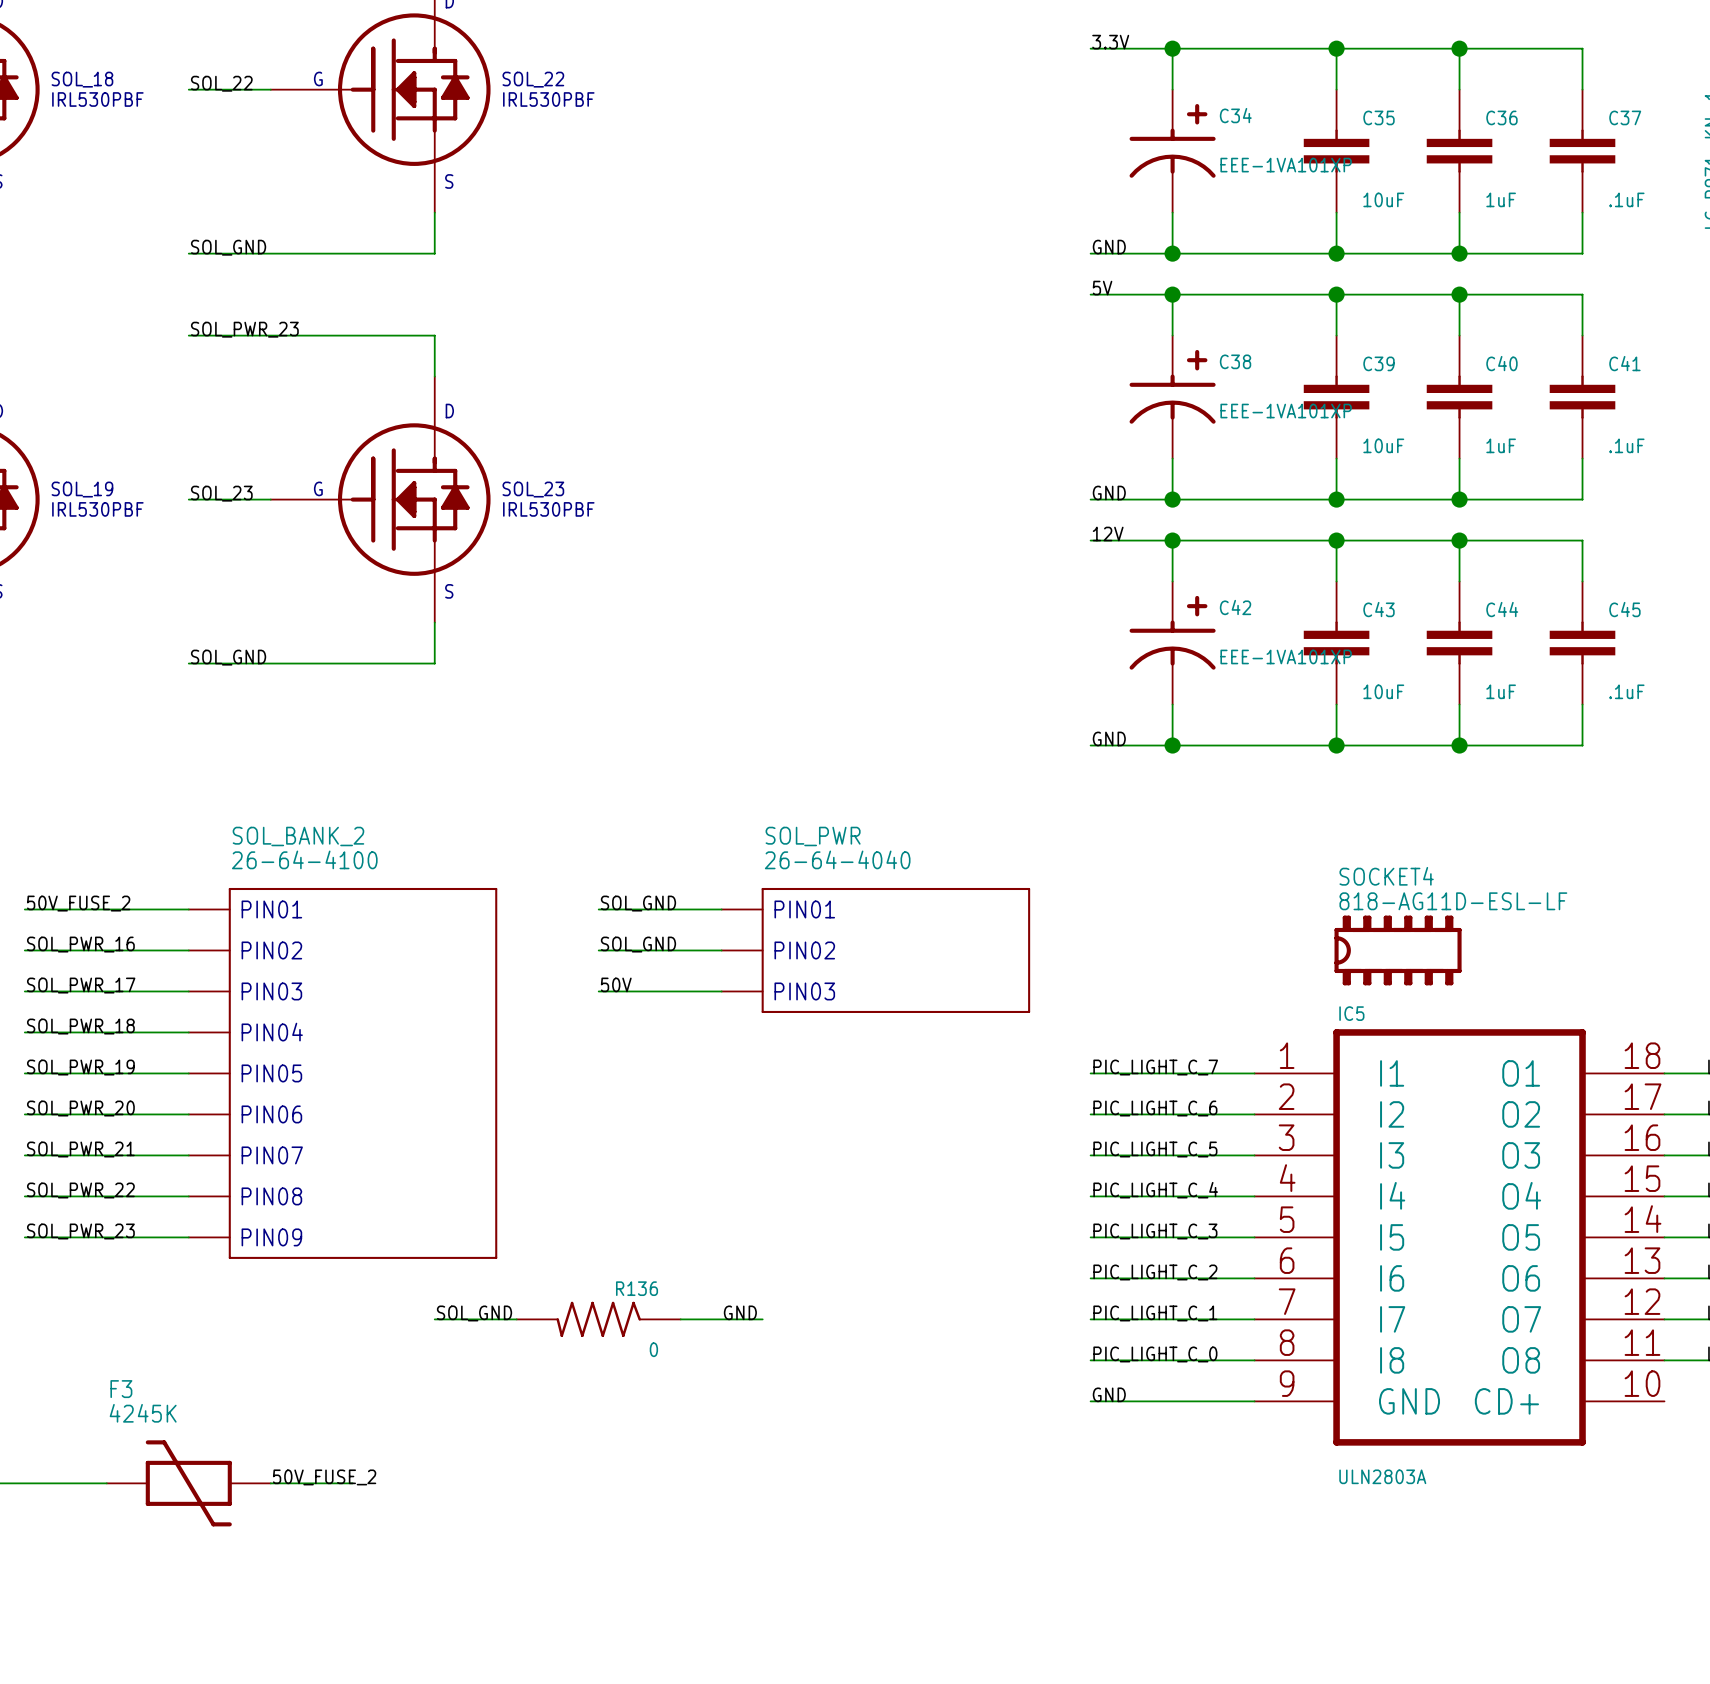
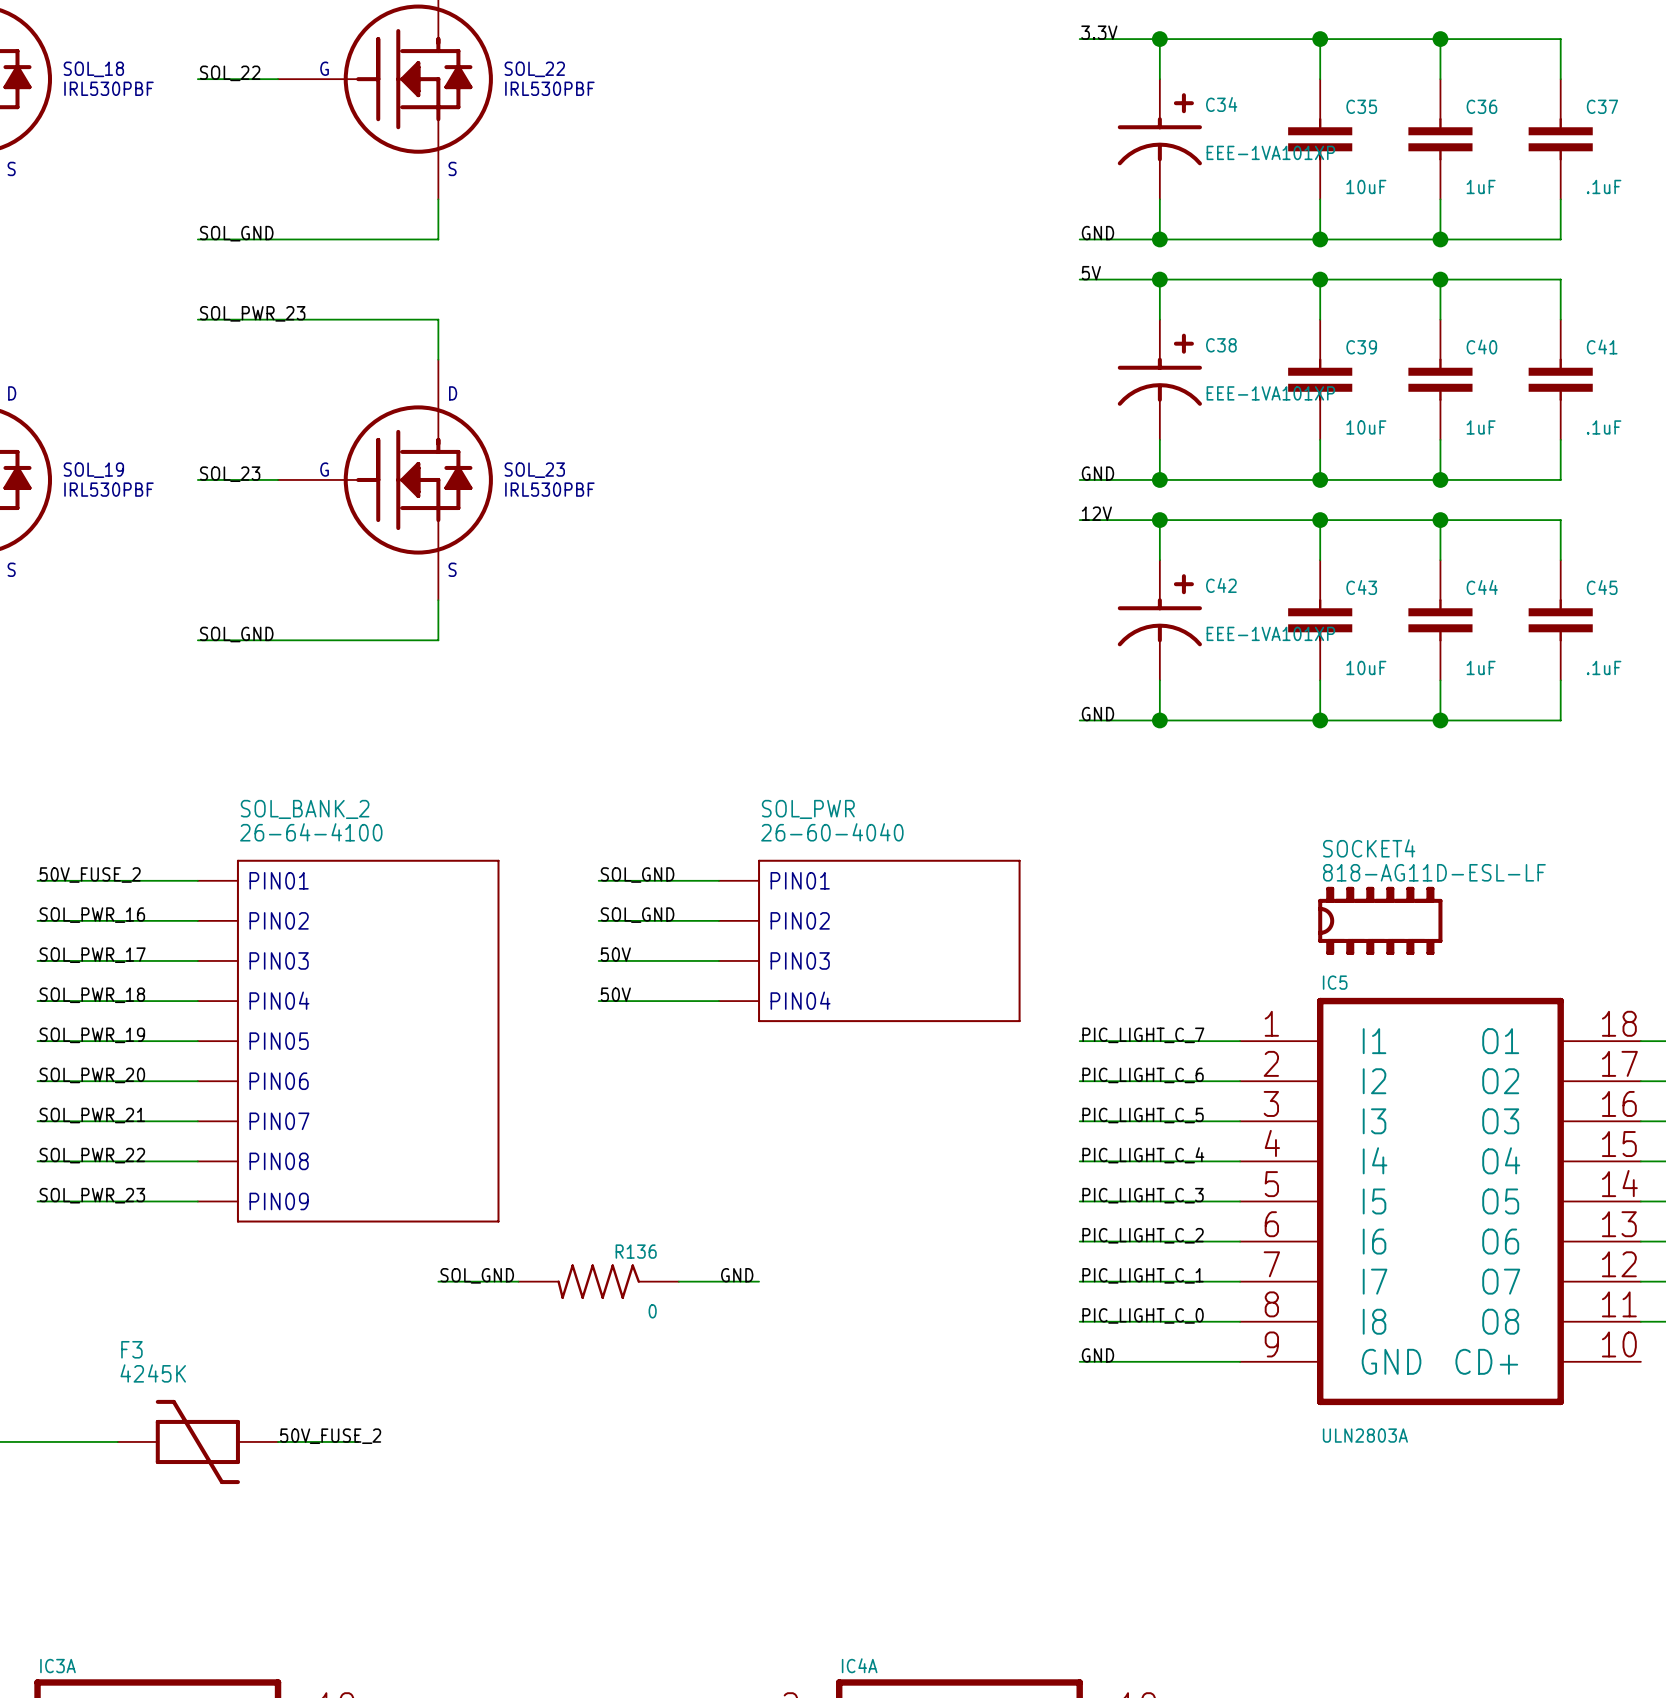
SOL_PWR: 26-64-4040 (875, 950) -> none
SOL_PWR: none -> 26-60-4040 (869, 940)
label: none -> 50V (615, 994)
wire: none -> (598, 1001) (718, 1001)

